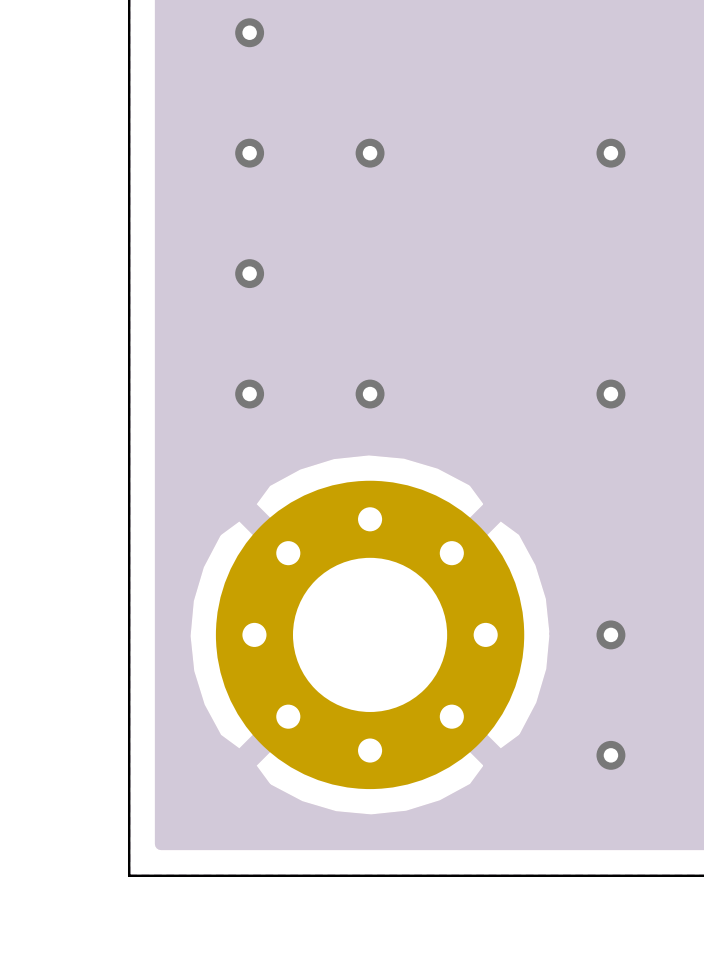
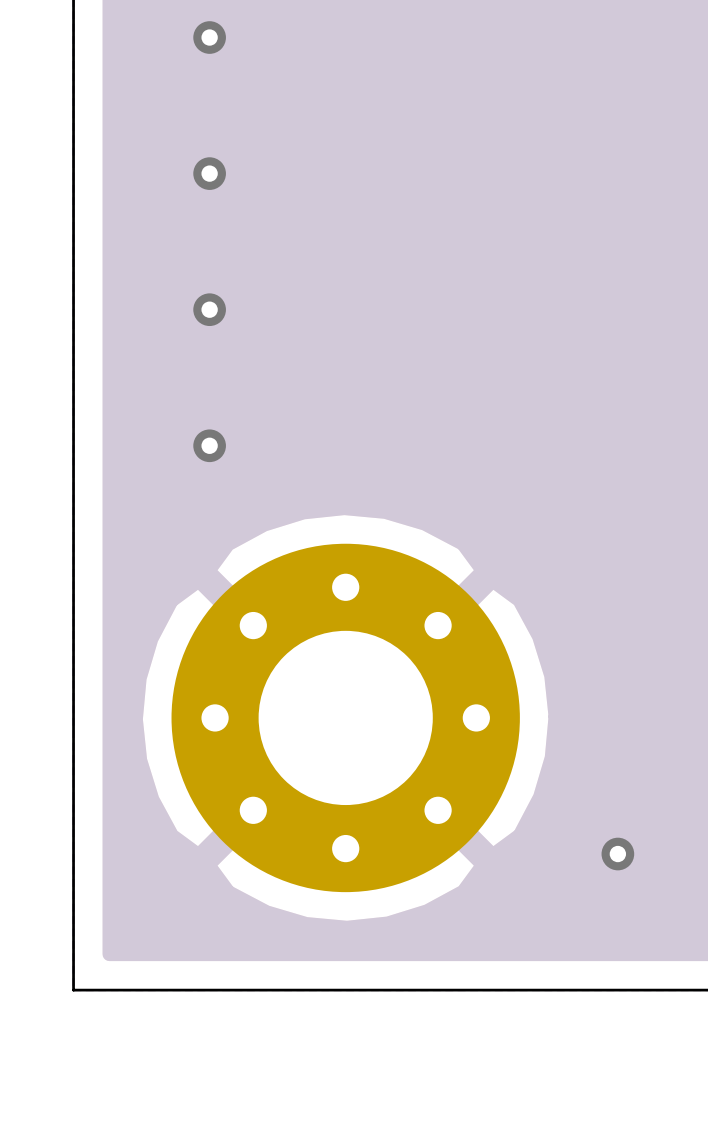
via: (370, 153) -> none
via: (610, 153) -> none
via: (370, 394) -> none
via: (610, 394) -> none
via: (610, 634) -> none

